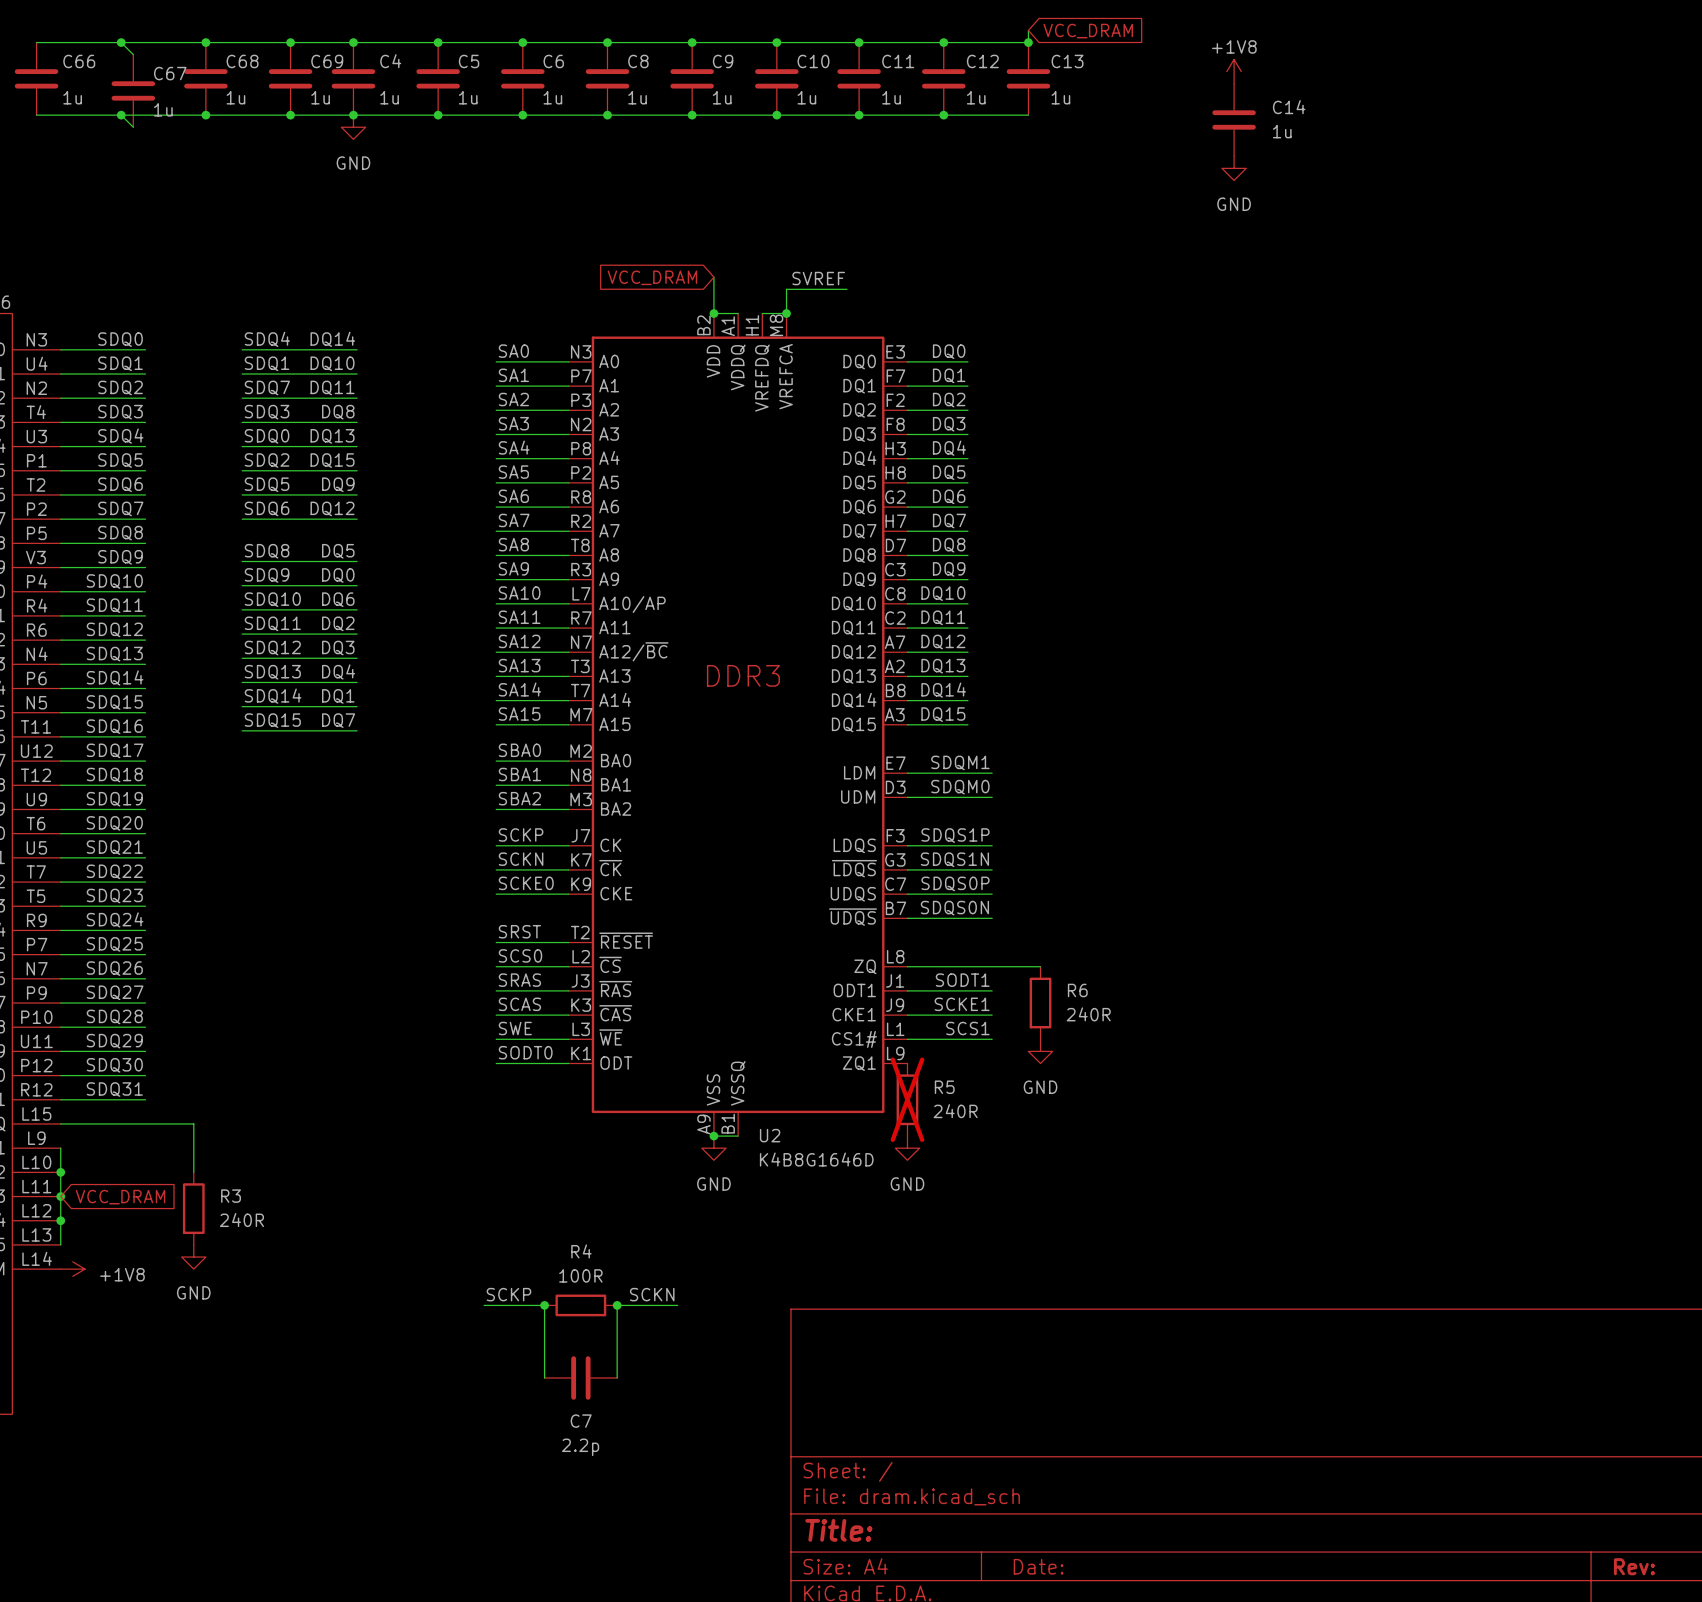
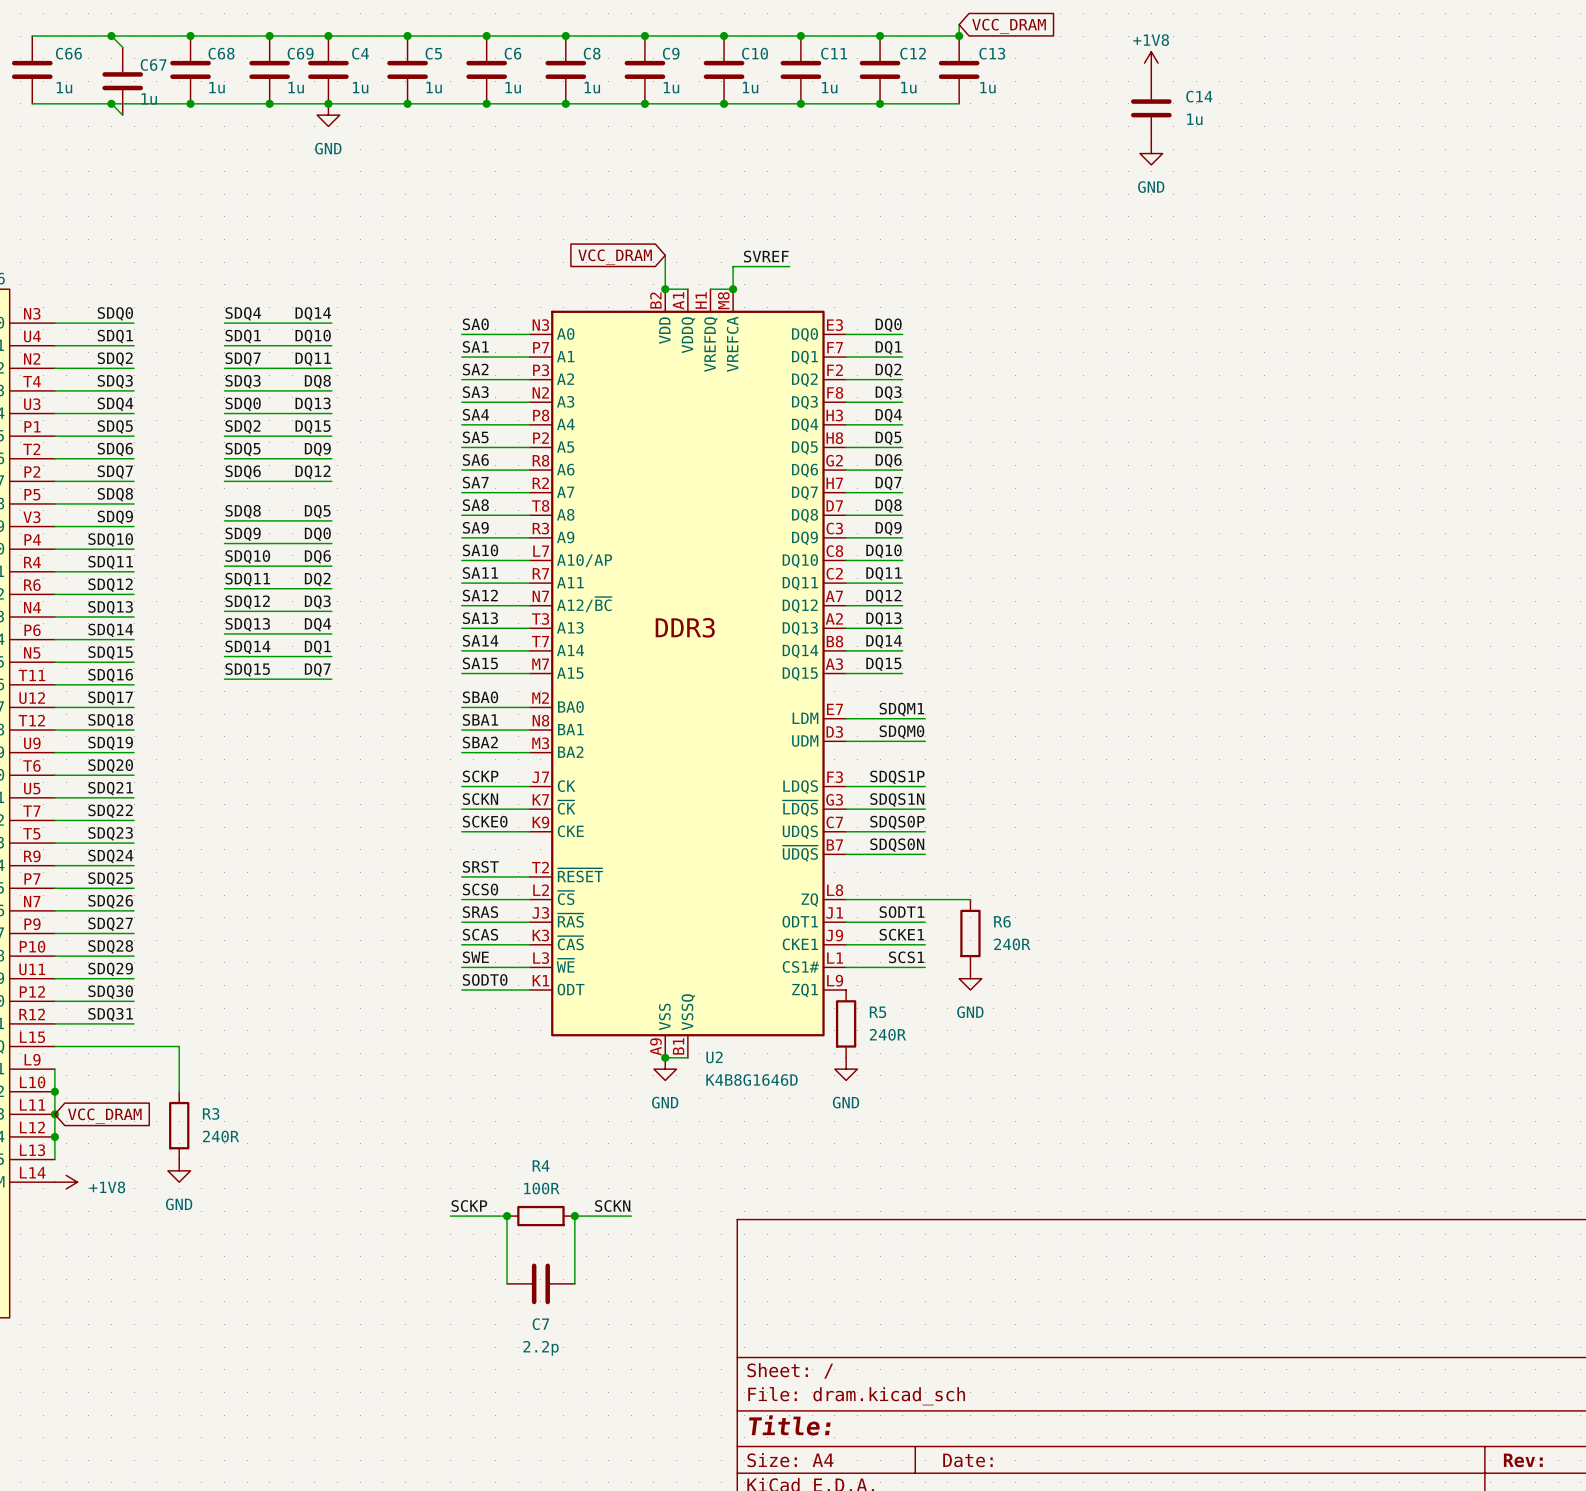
R5 do-not-place cross: (907, 1099) -> none

